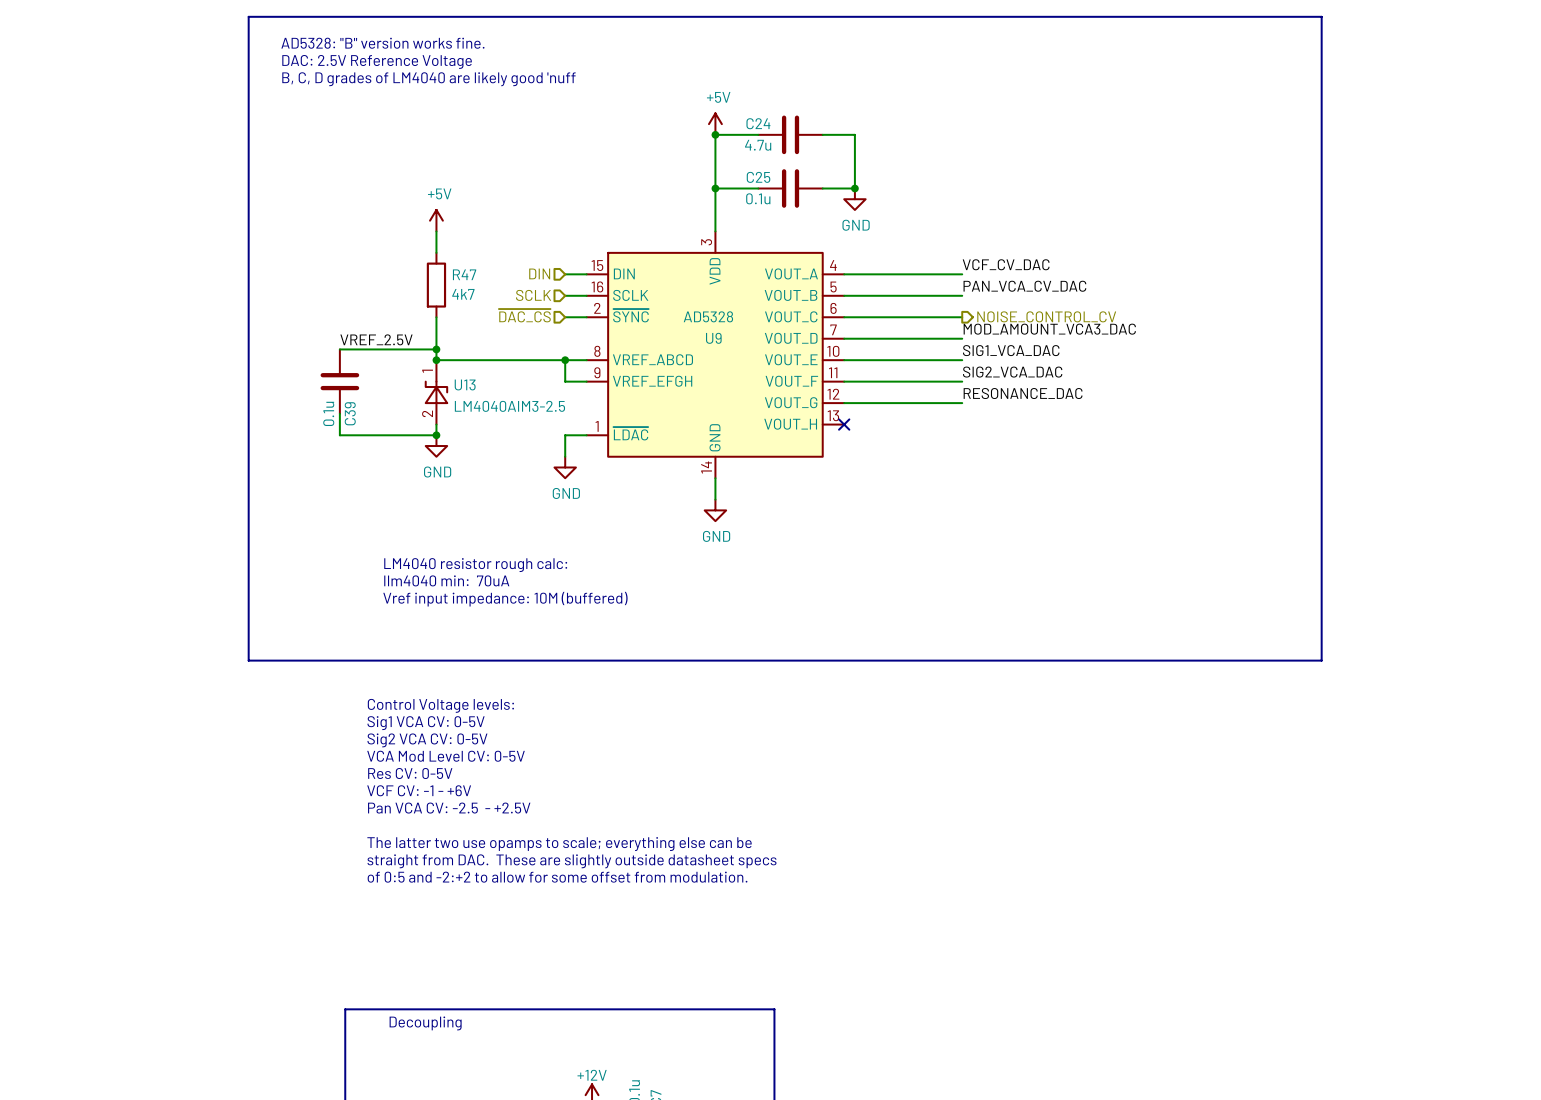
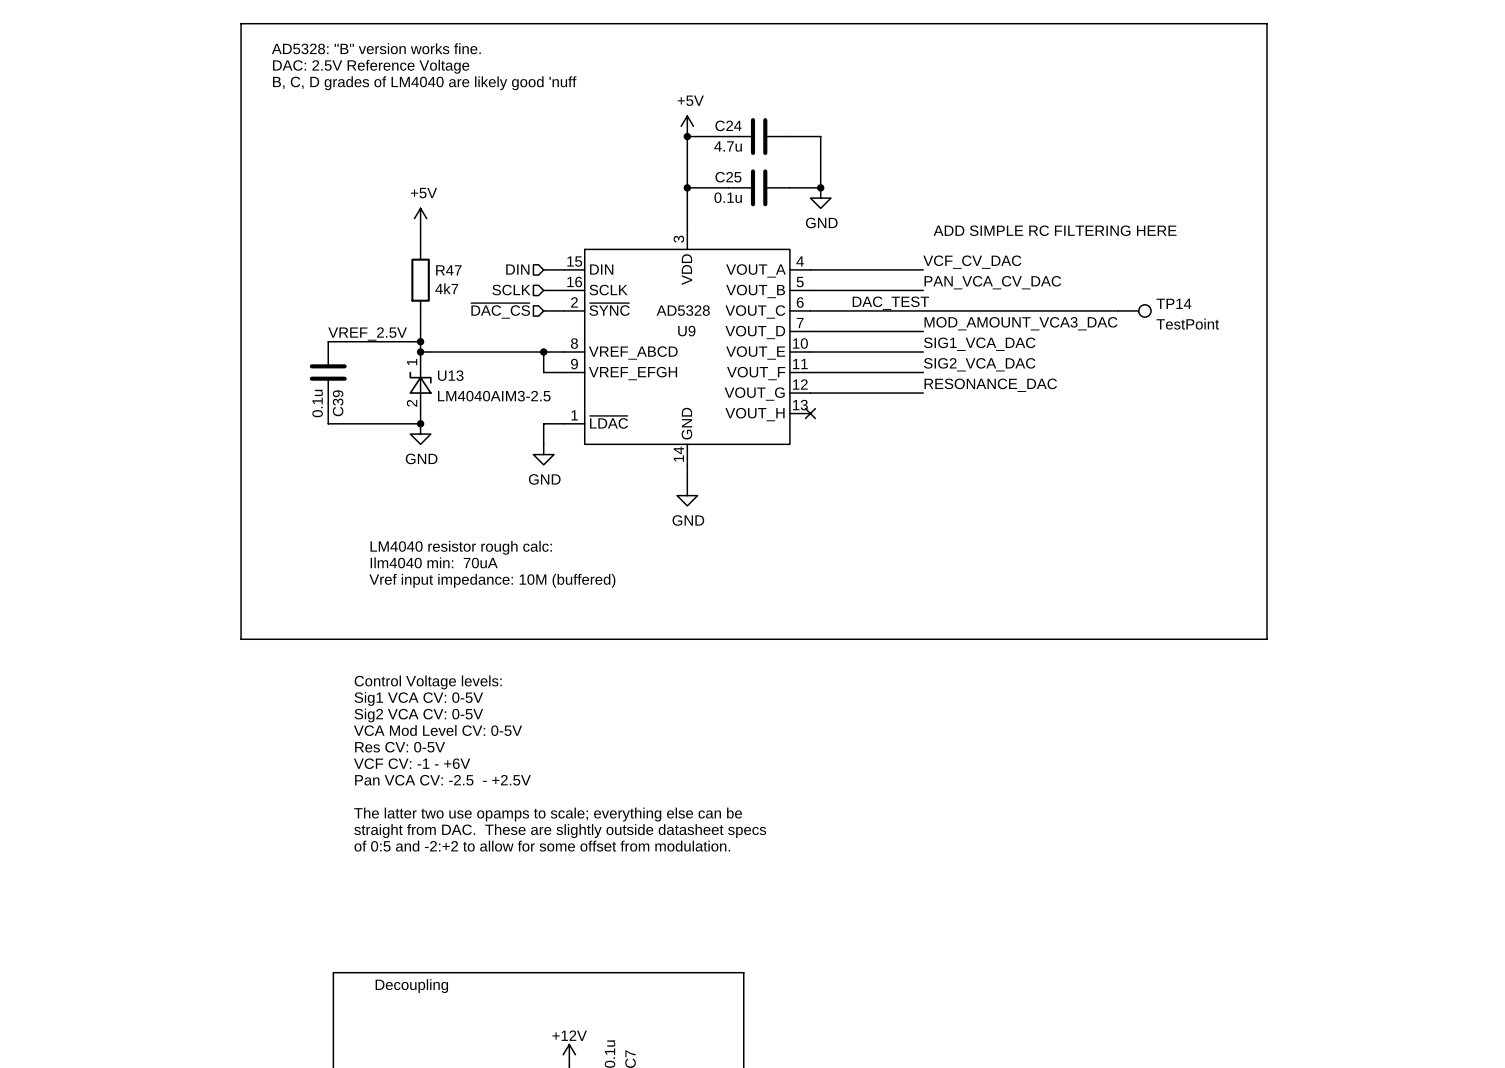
text: none -> ADD SIMPLE RC FILTERING HERE (1055, 230)
label: none -> DAC_TEST (890, 303)
hierarchical label: NOISE_CONTROL_CV (1046, 316) -> none
wire: none -> (923, 310) (1118, 310)
TP14: none -> TestPoint (1134, 310)

